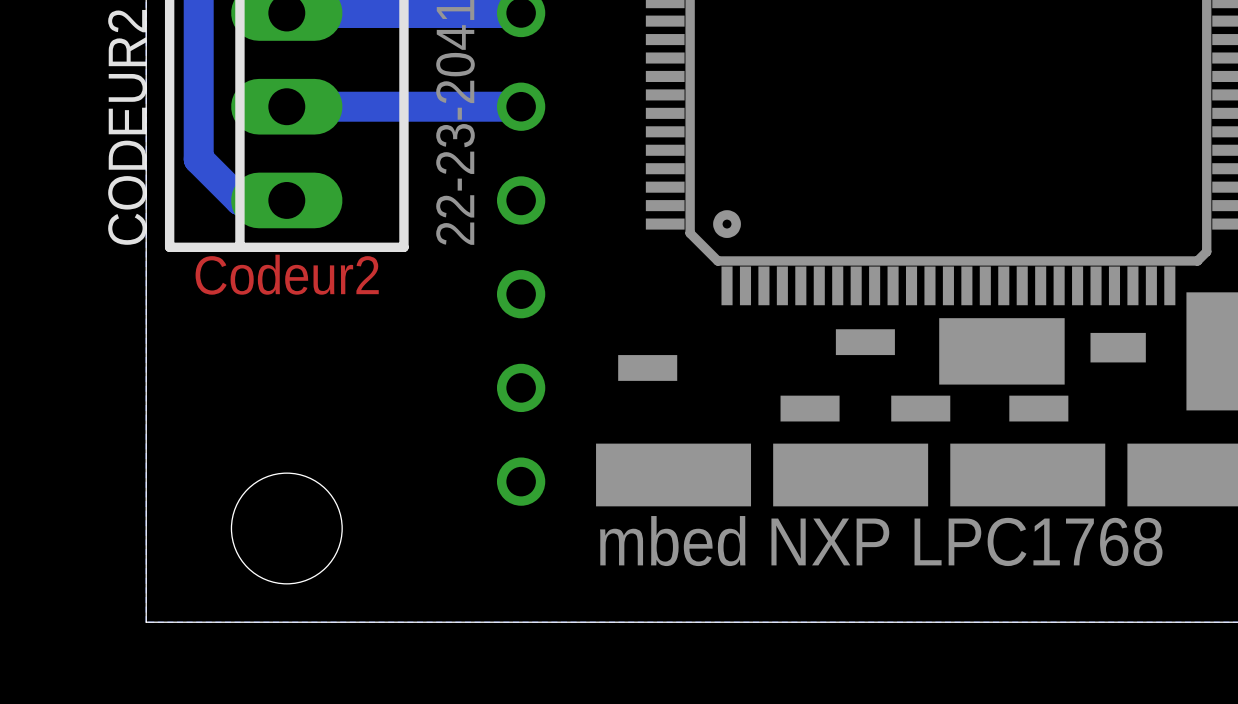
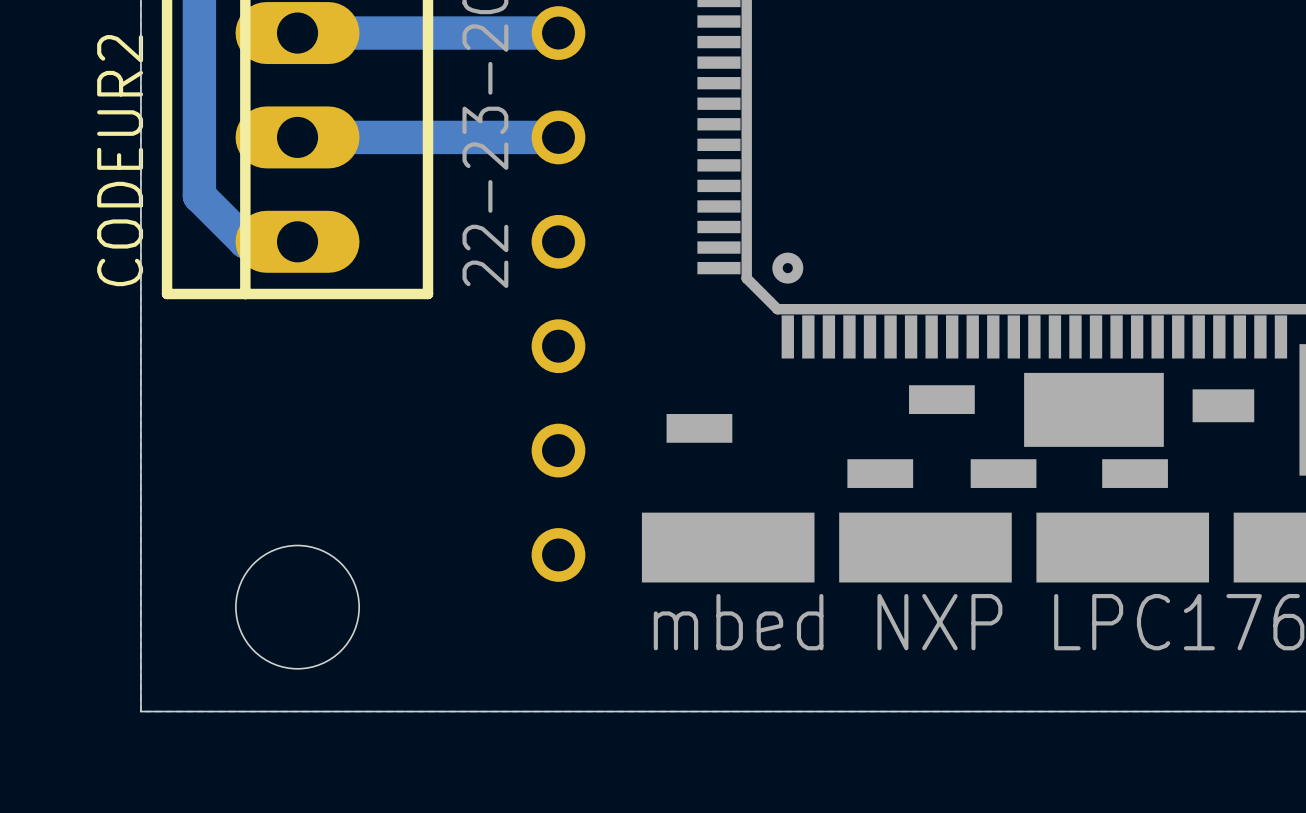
text: Codeur2 (287, 274) -> none

